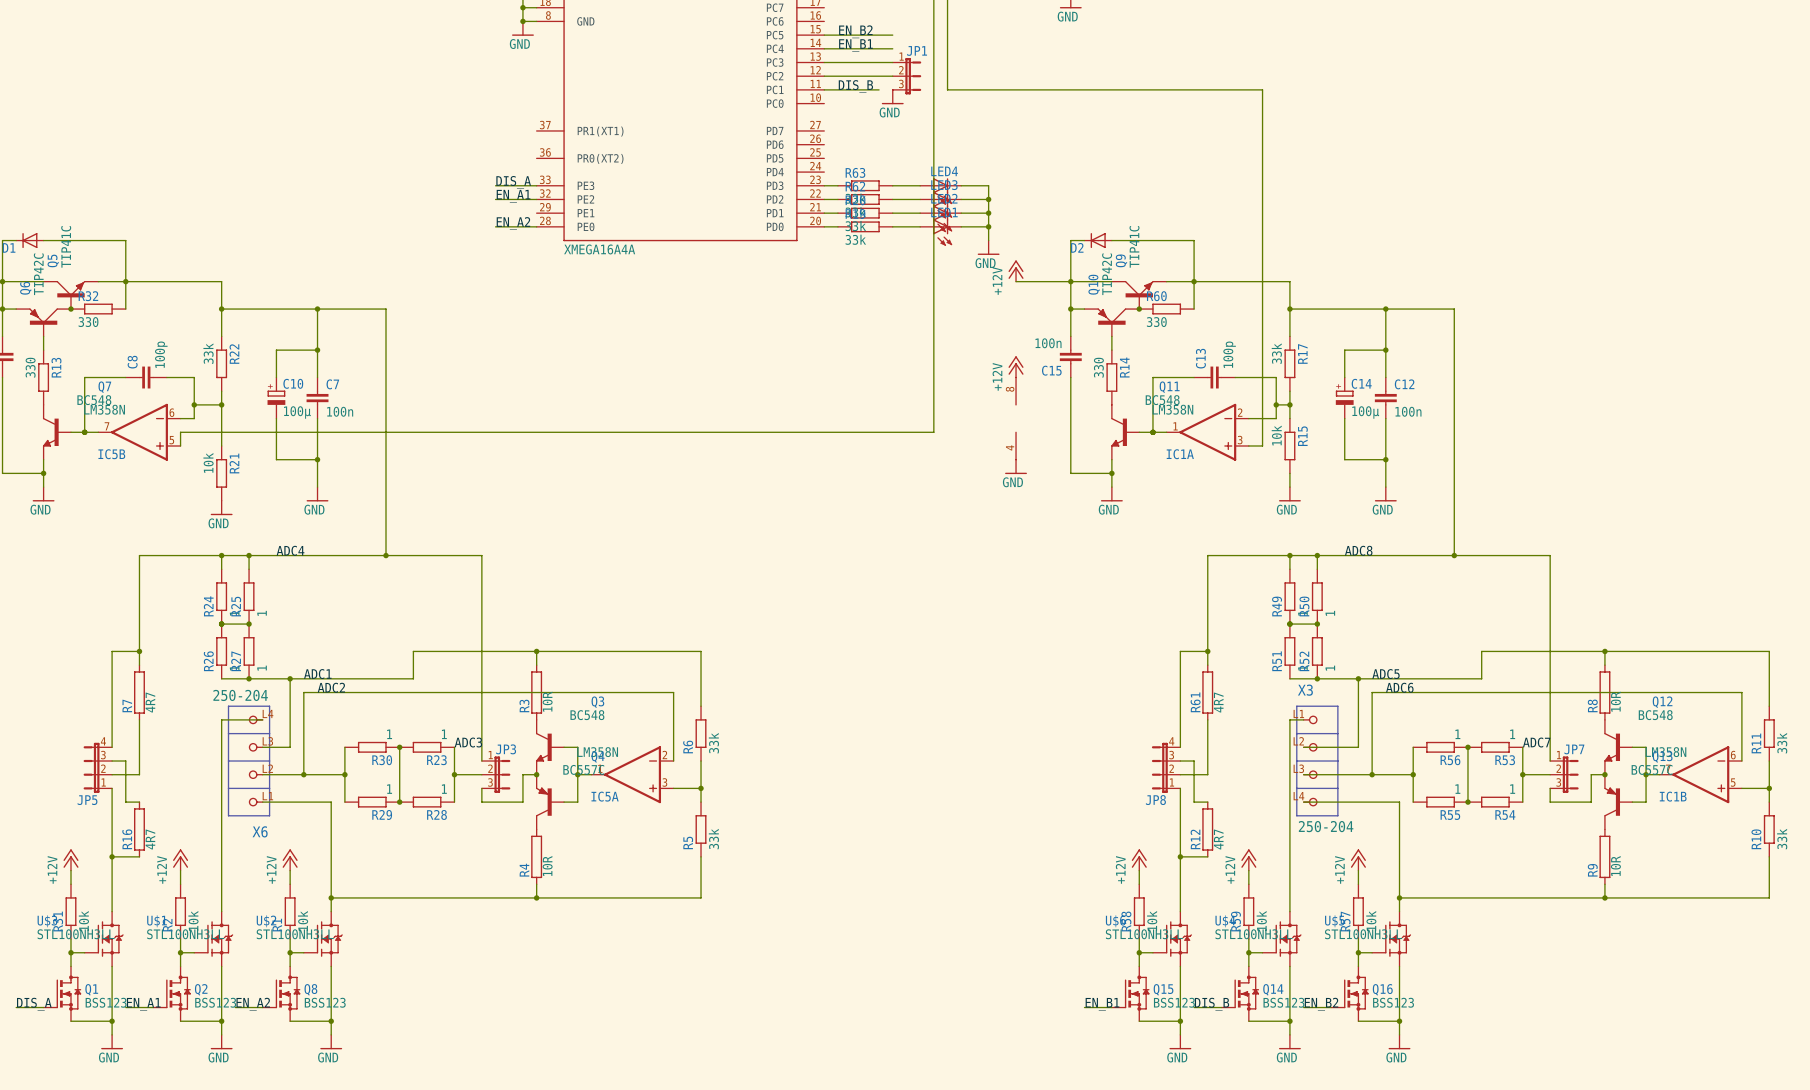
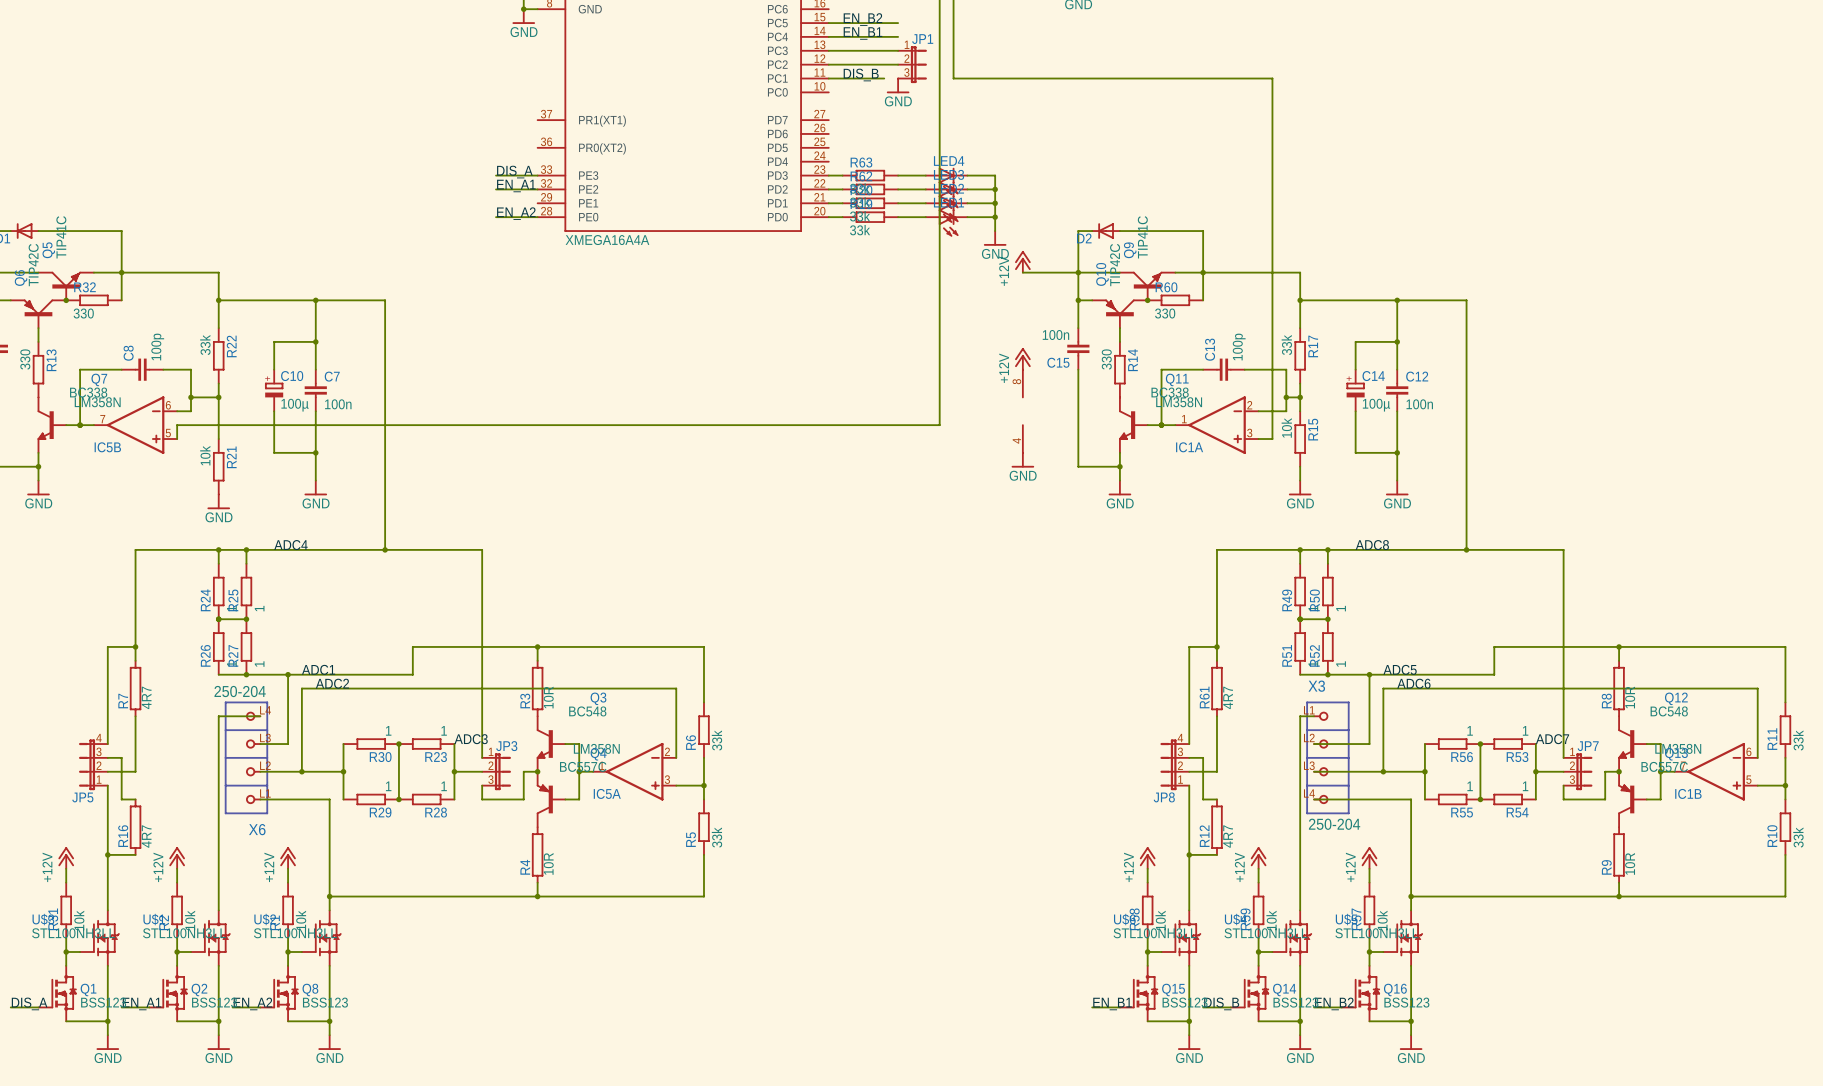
Q7 value: BC548 (94, 400) -> BC338 (88, 392)
Q11 value: BC548 (1162, 400) -> BC338 (1170, 392)

